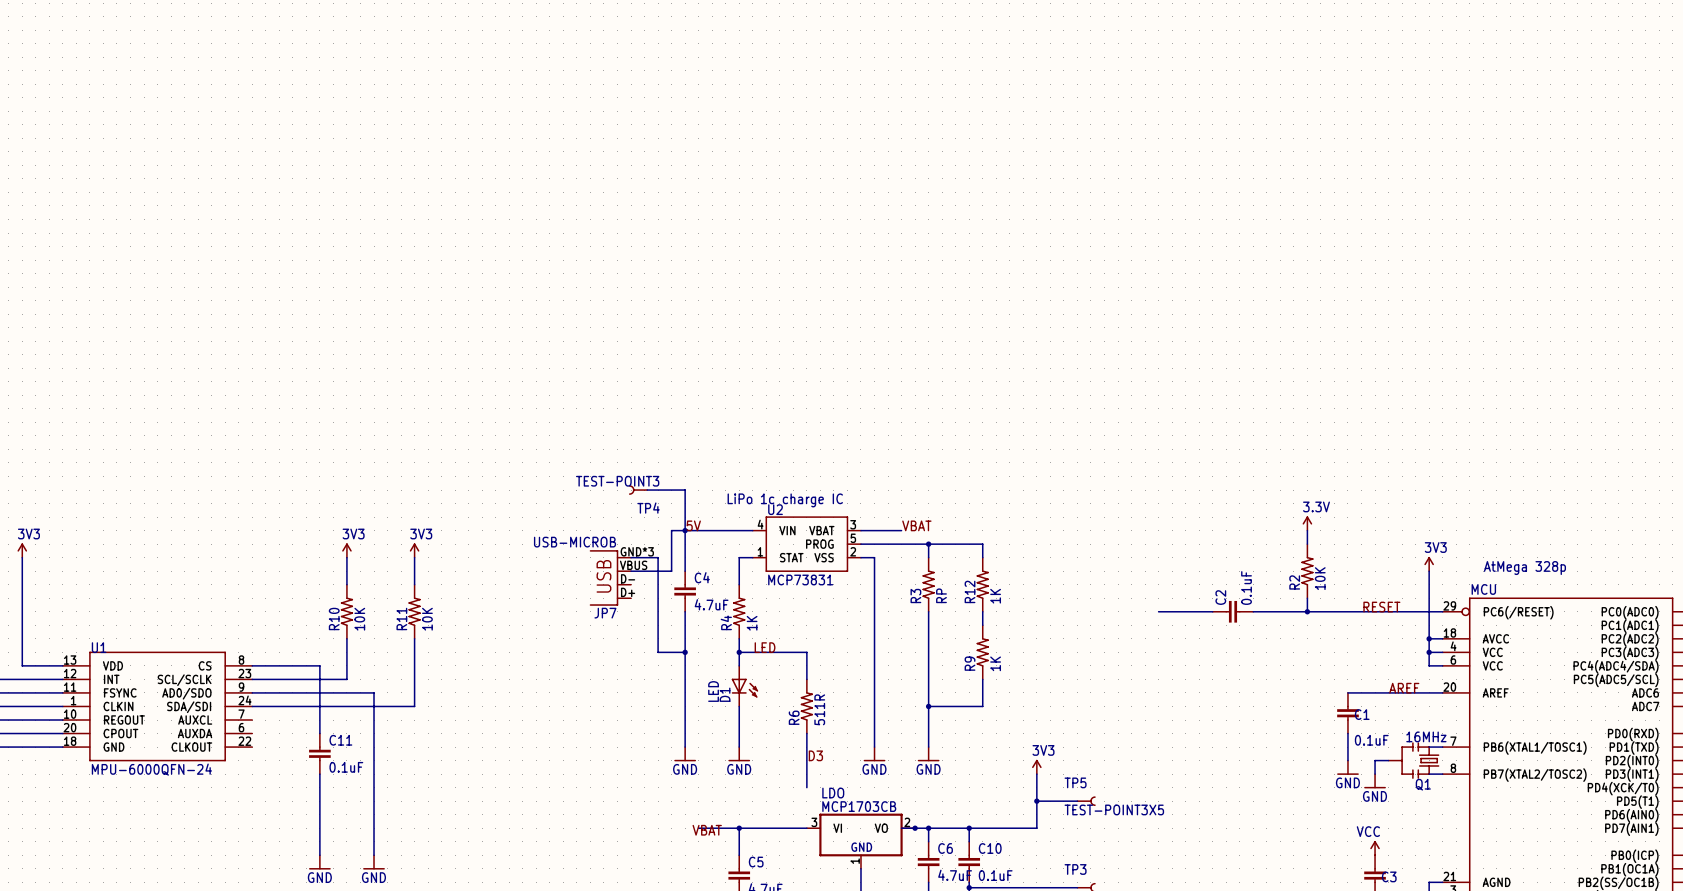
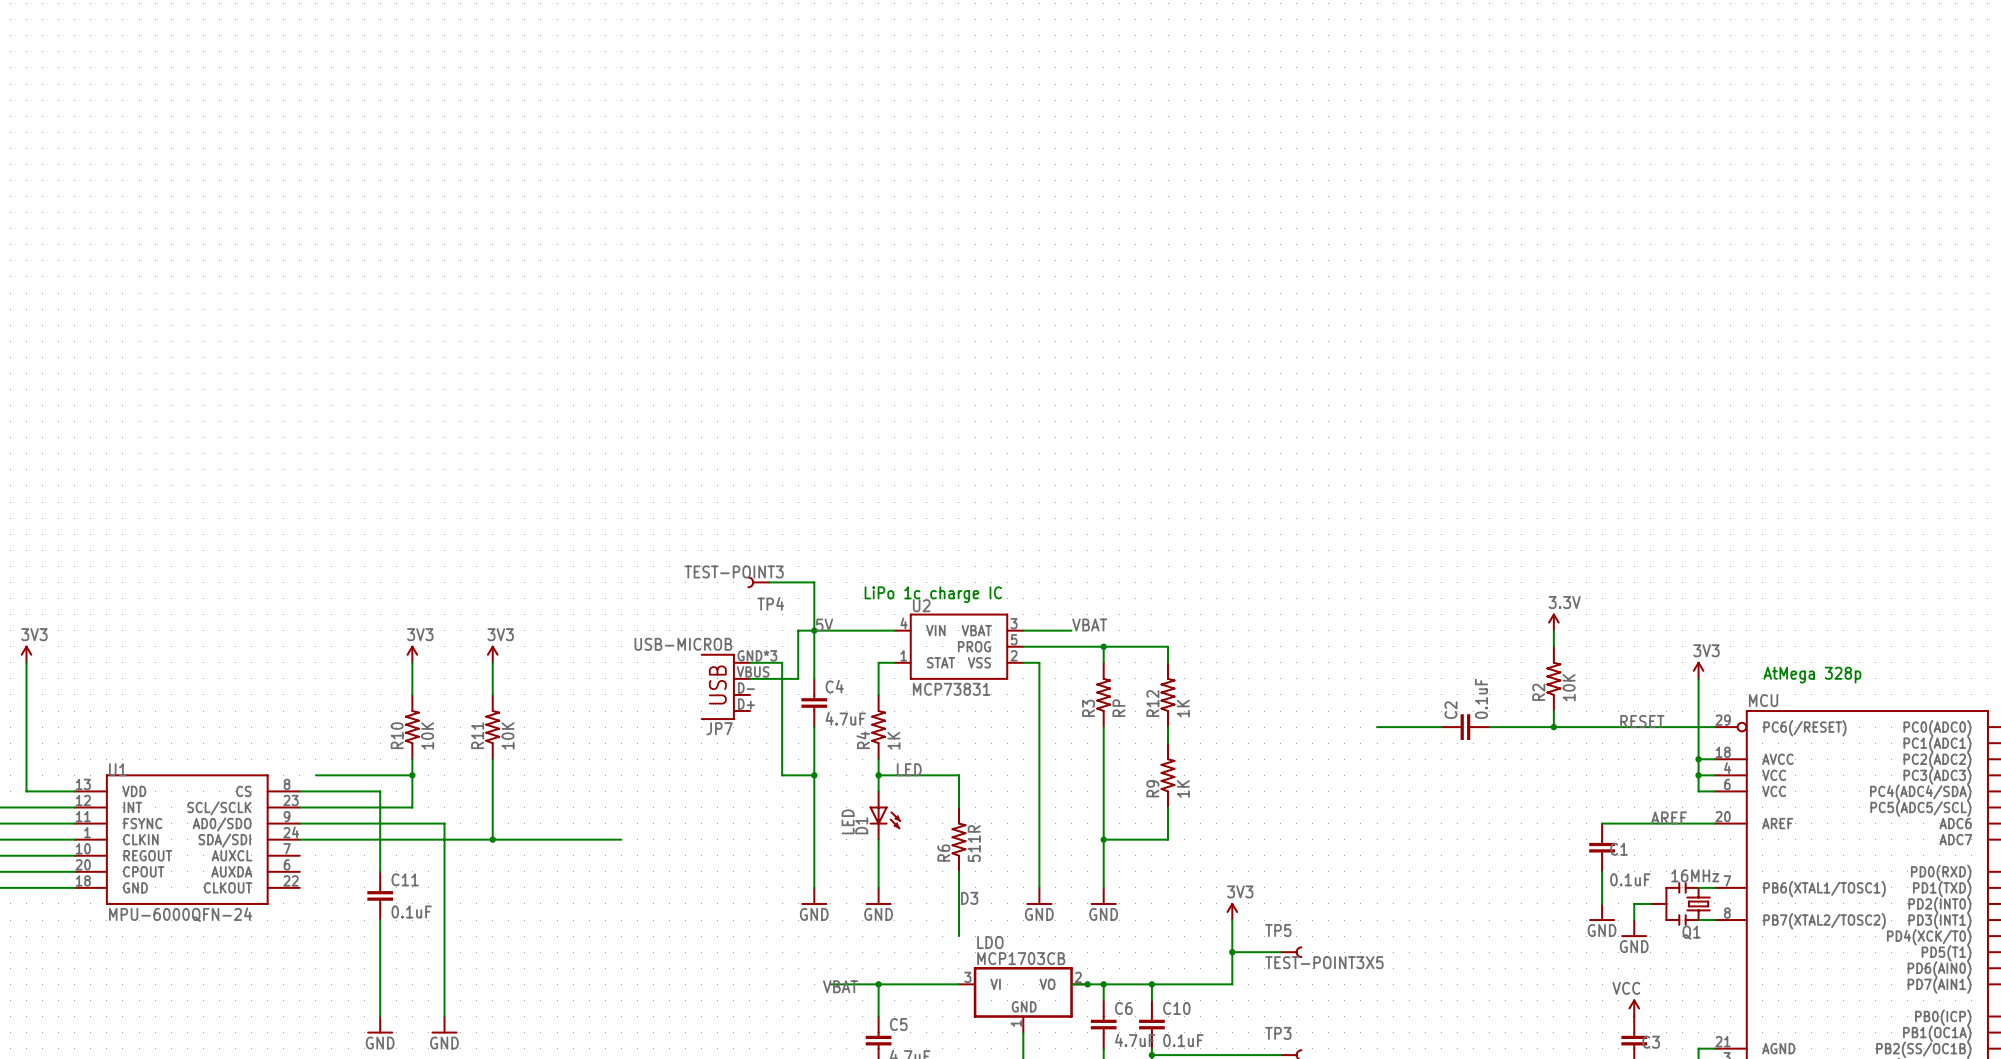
wire: none -> (315, 775) (412, 775)
junction: none -> (412, 775)
wire: none -> (492, 839) (621, 839)
junction: none -> (492, 839)

